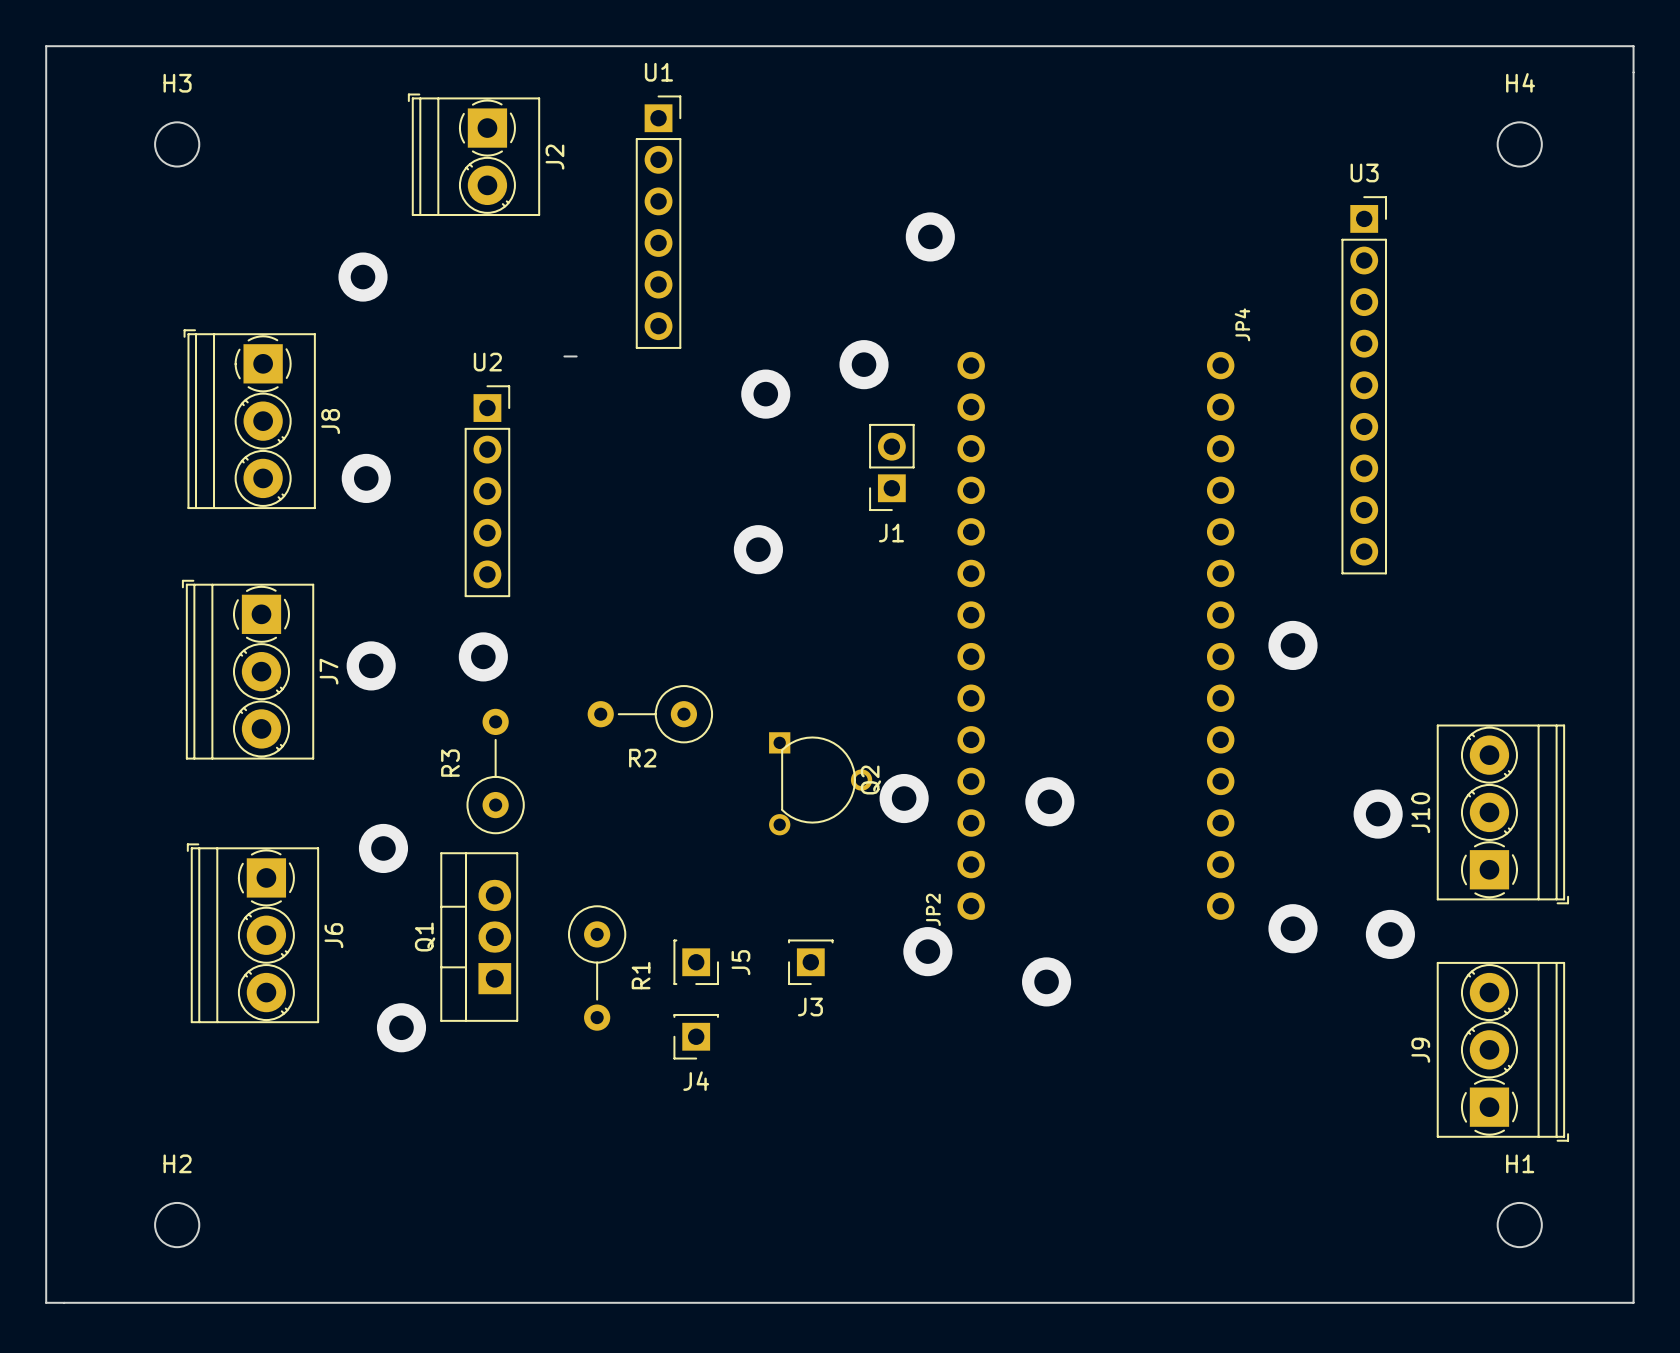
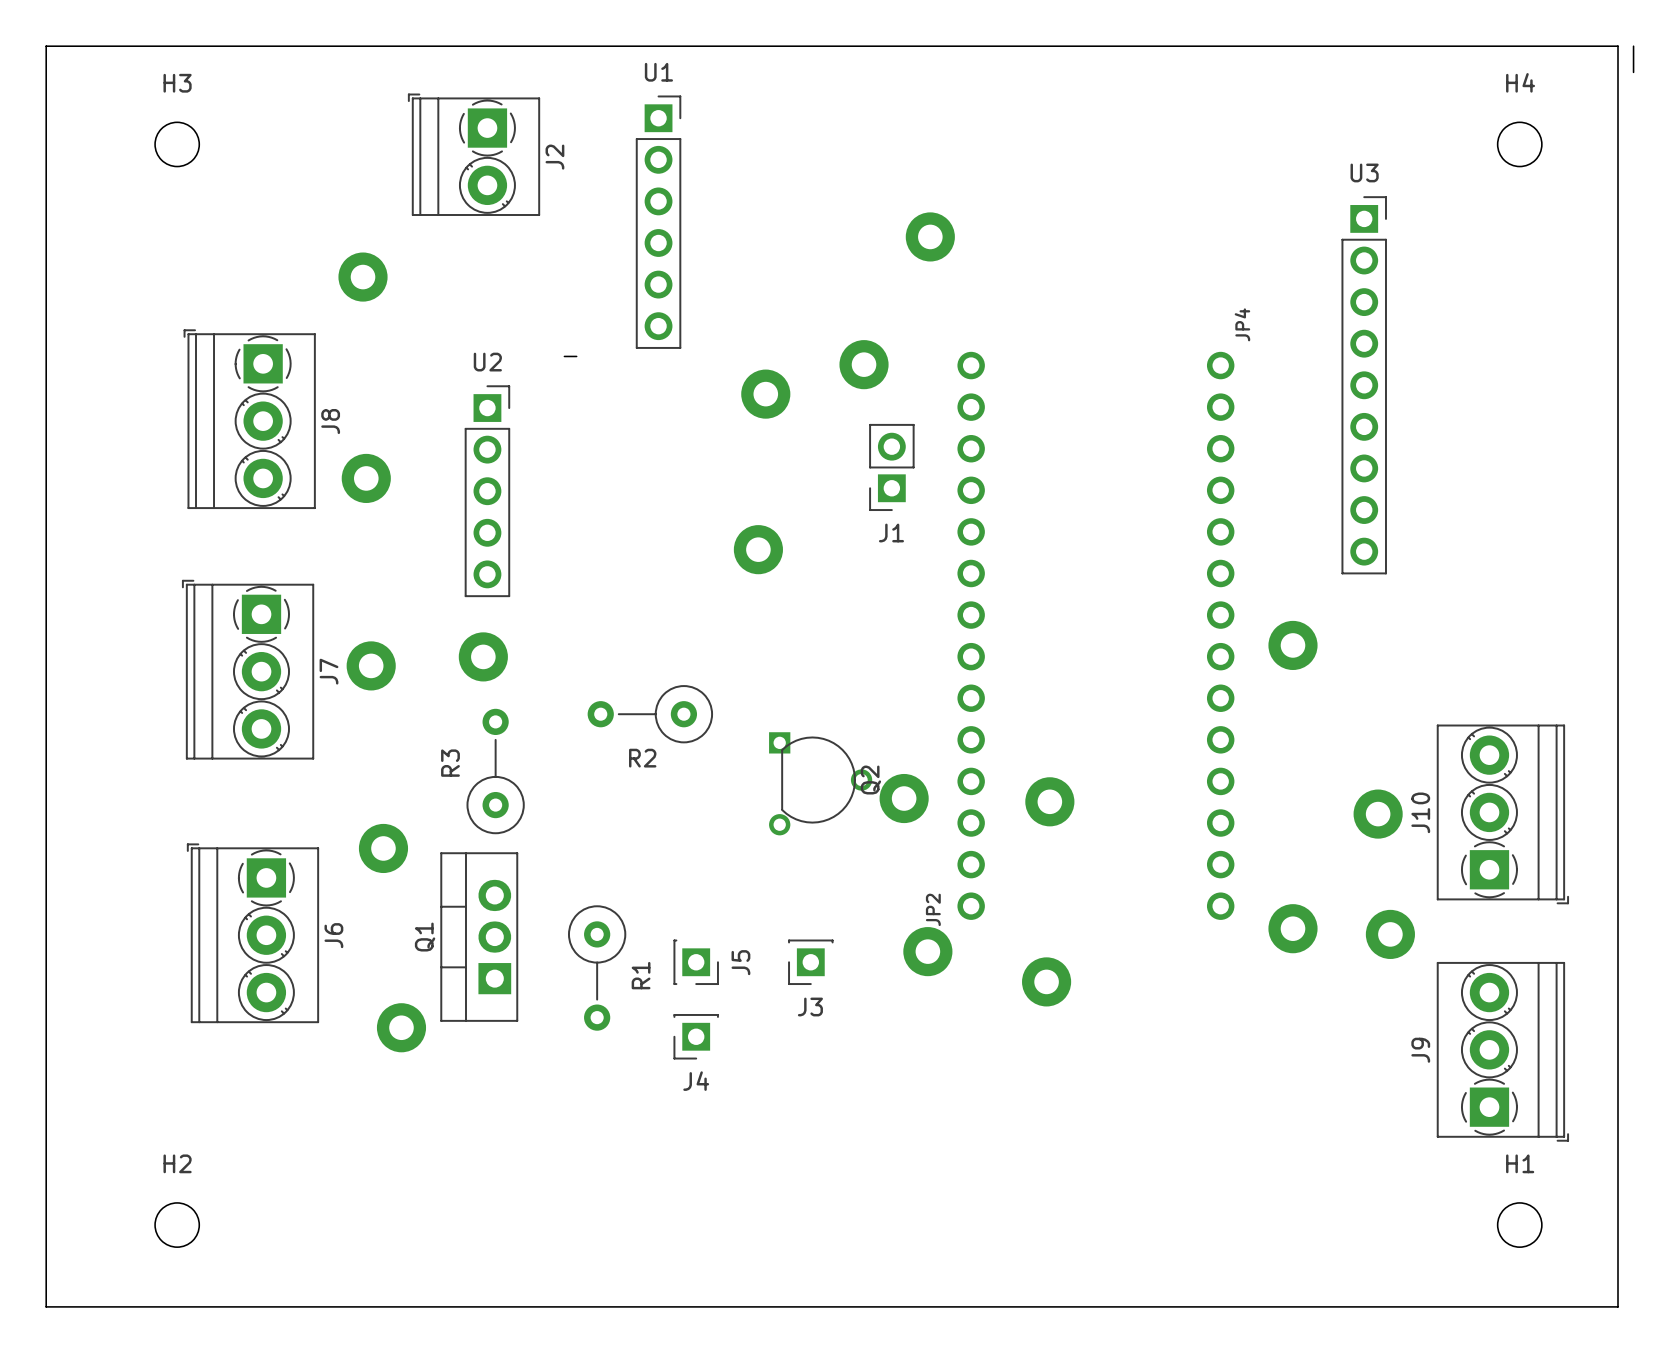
board edge: (1618, 46) (1633, 46) -> none
board edge: (1633, 72) (1633, 1302) (46, 1302) -> (1618, 46) (1618, 1306) (46, 1306) (46, 1302)

